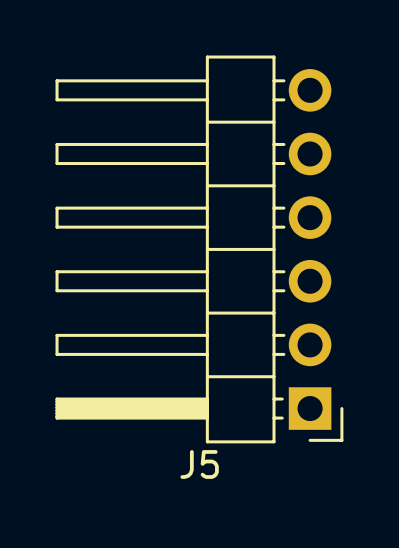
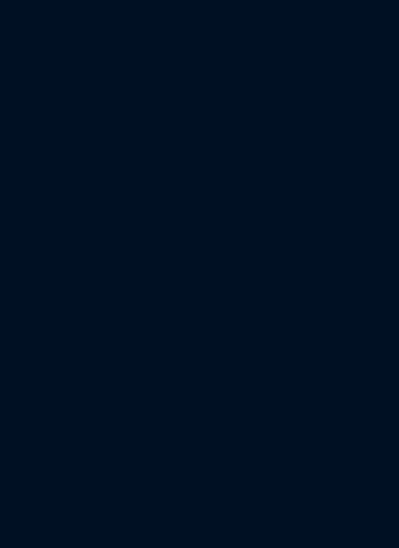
J5: (199, 249) -> none

